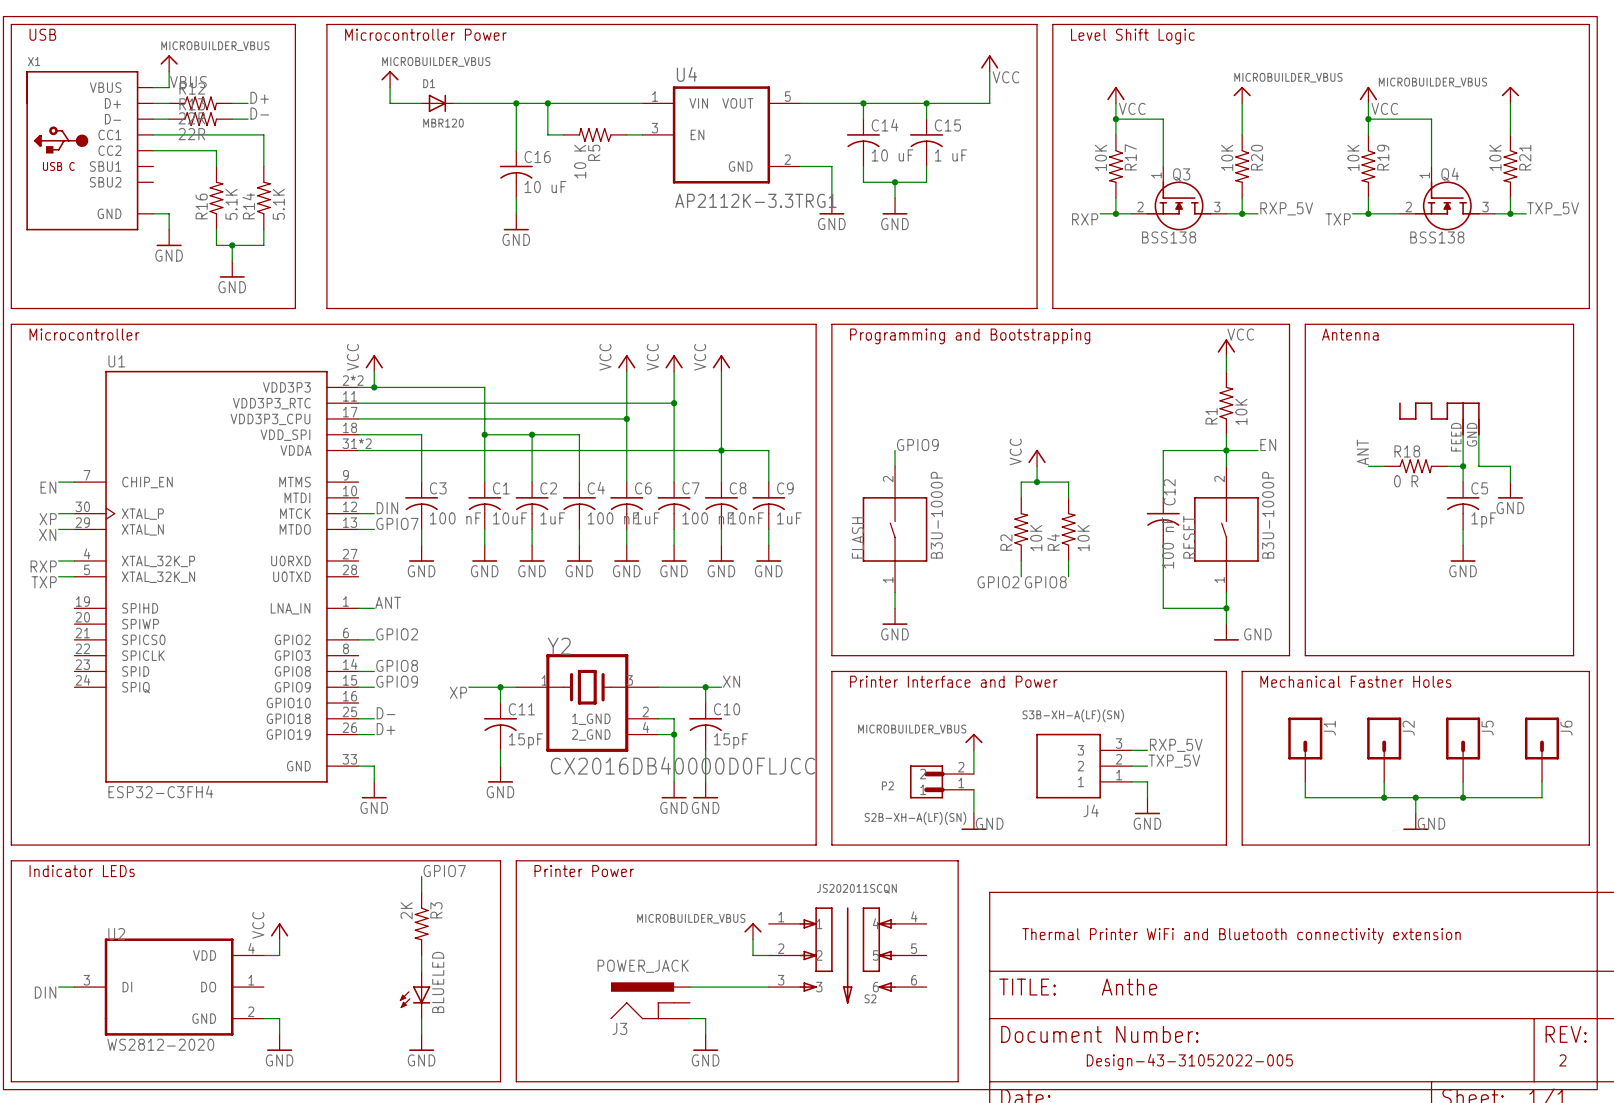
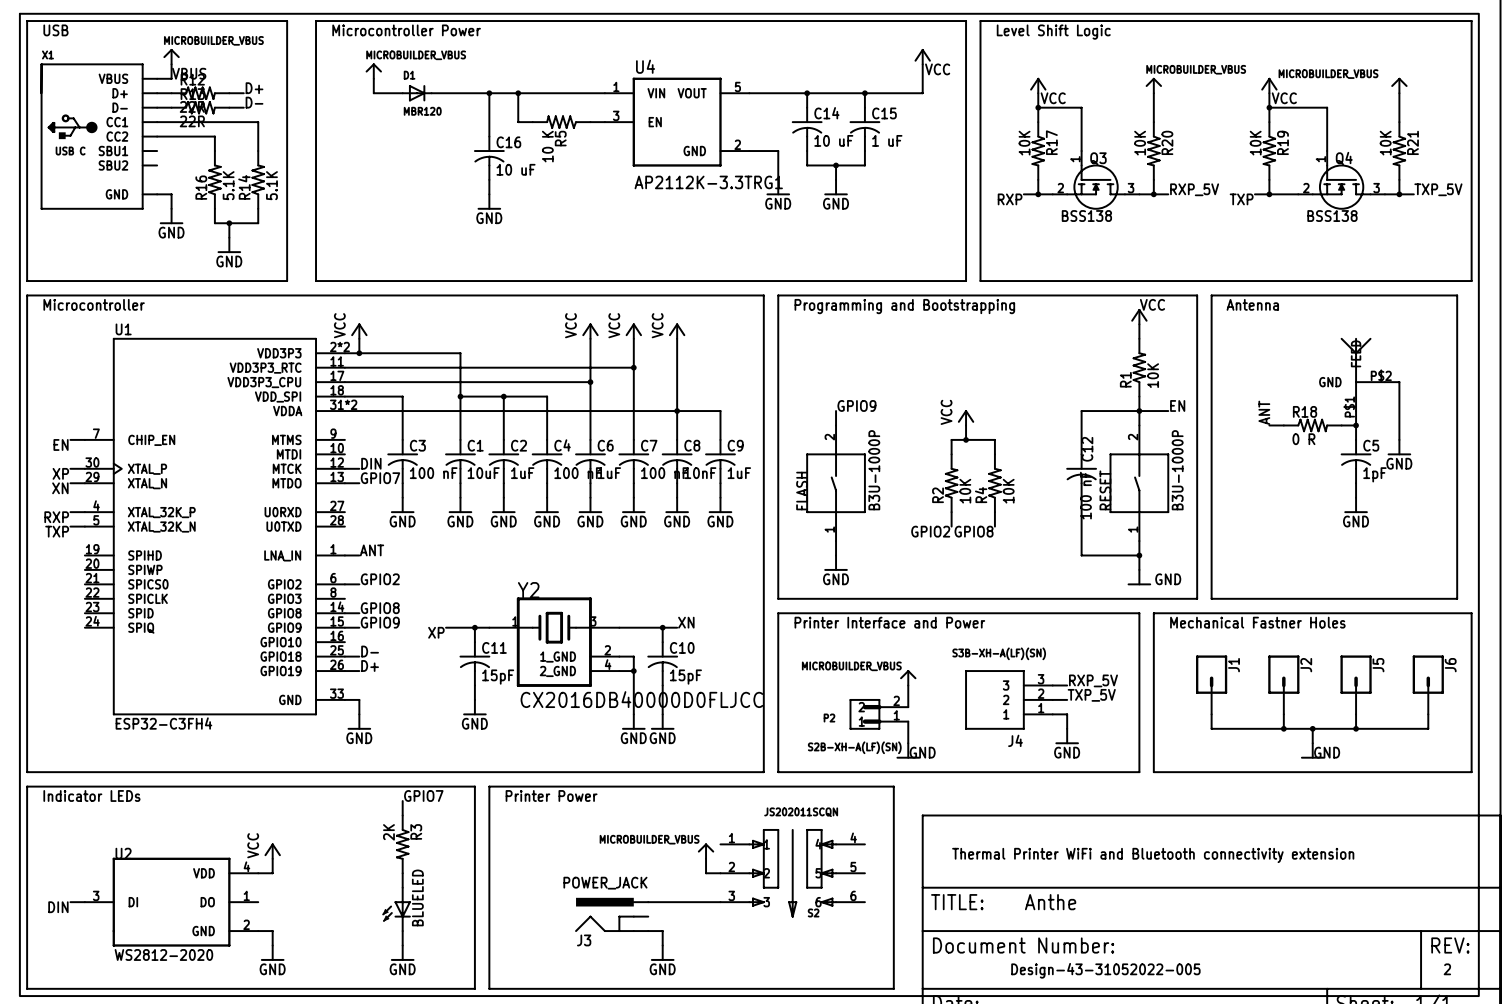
part: none -> (1362, 374)
part: (1439, 418) -> none
wire: (1478, 434) (1478, 466) (1510, 466) -> (1384, 382) (1399, 382) (1399, 425)

